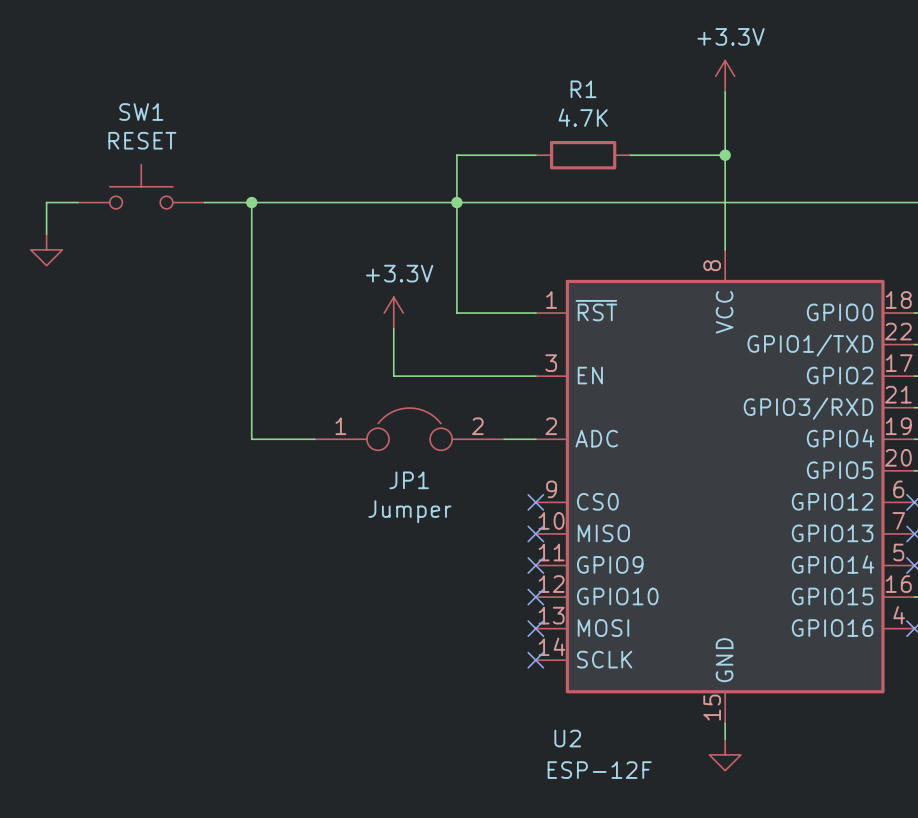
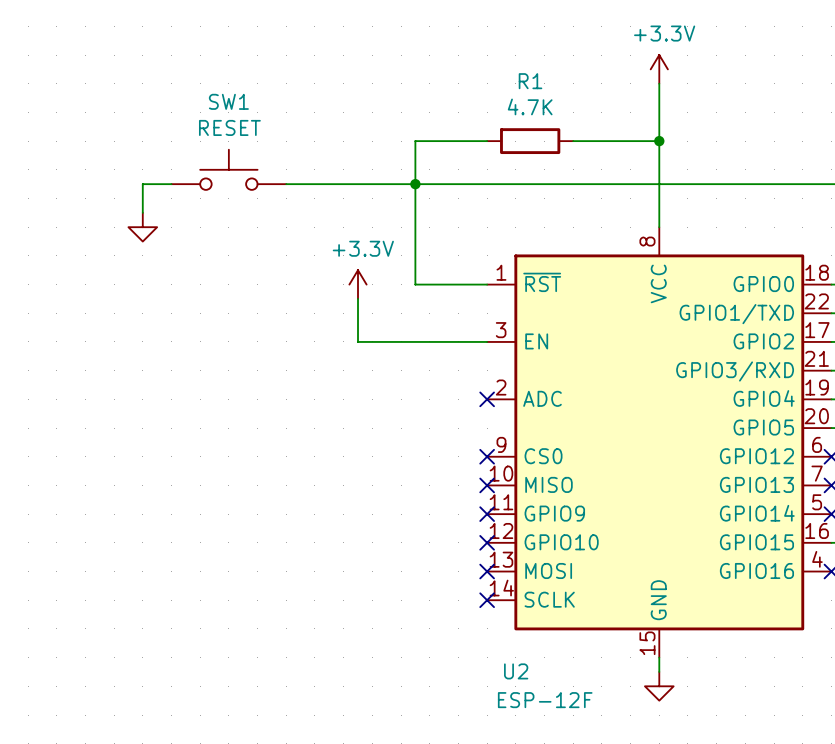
SW1 position: (141, 186) -> (228, 169)
wire: (78, 202) (46, 202) (46, 234) -> (171, 184) (142, 184) (142, 212)
wire: (204, 202) (314, 202) -> none
wire: (251, 202) (251, 439) (314, 439) -> none
junction: (251, 202) -> none
power symbol position: (46, 249) -> (142, 227)
JP1: Jumper (409, 429) -> none
wire: (504, 439) (535, 439) -> none
no-connect mark: none -> (487, 399)

